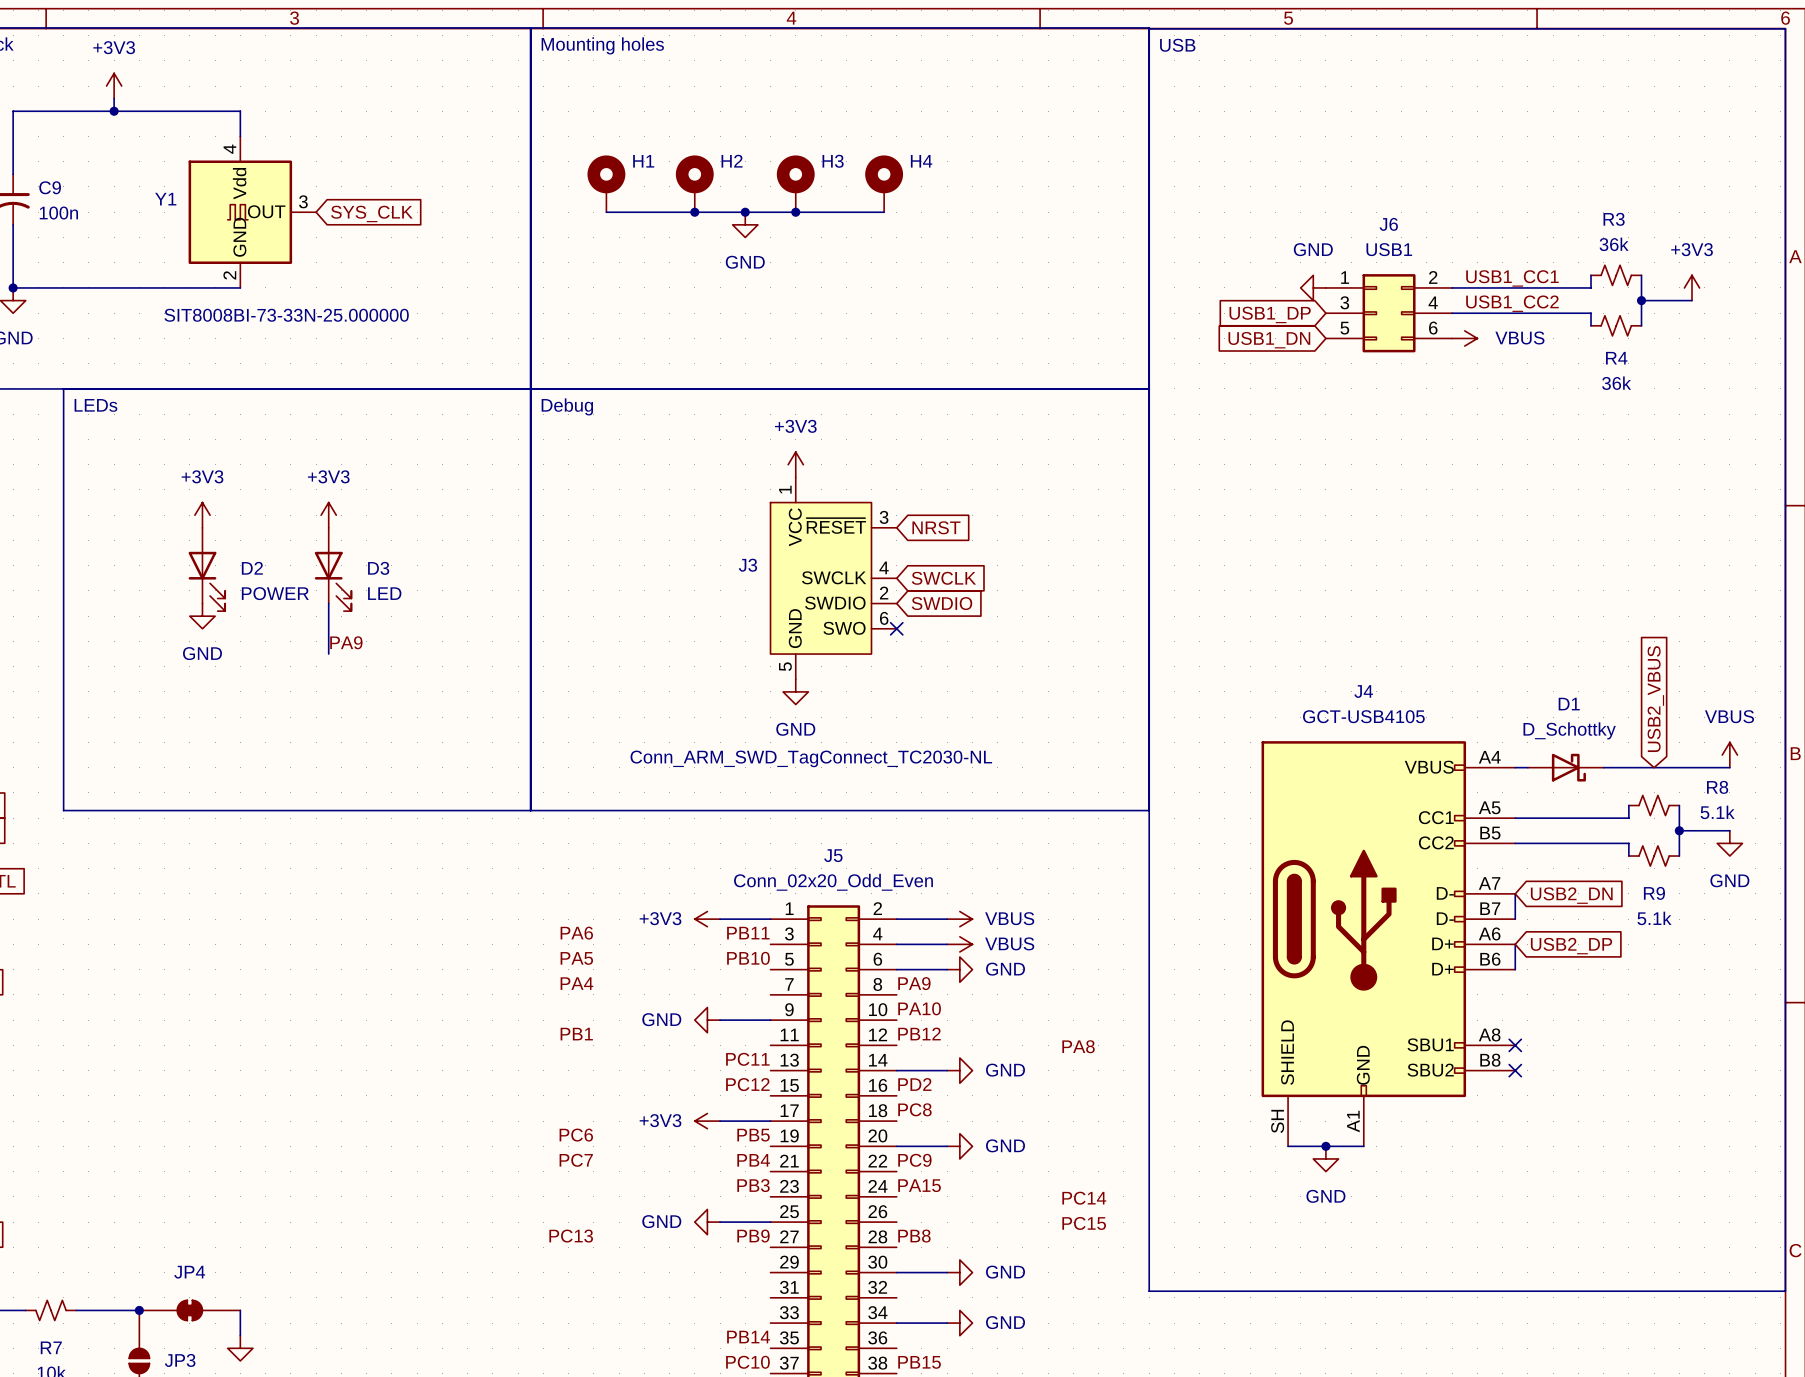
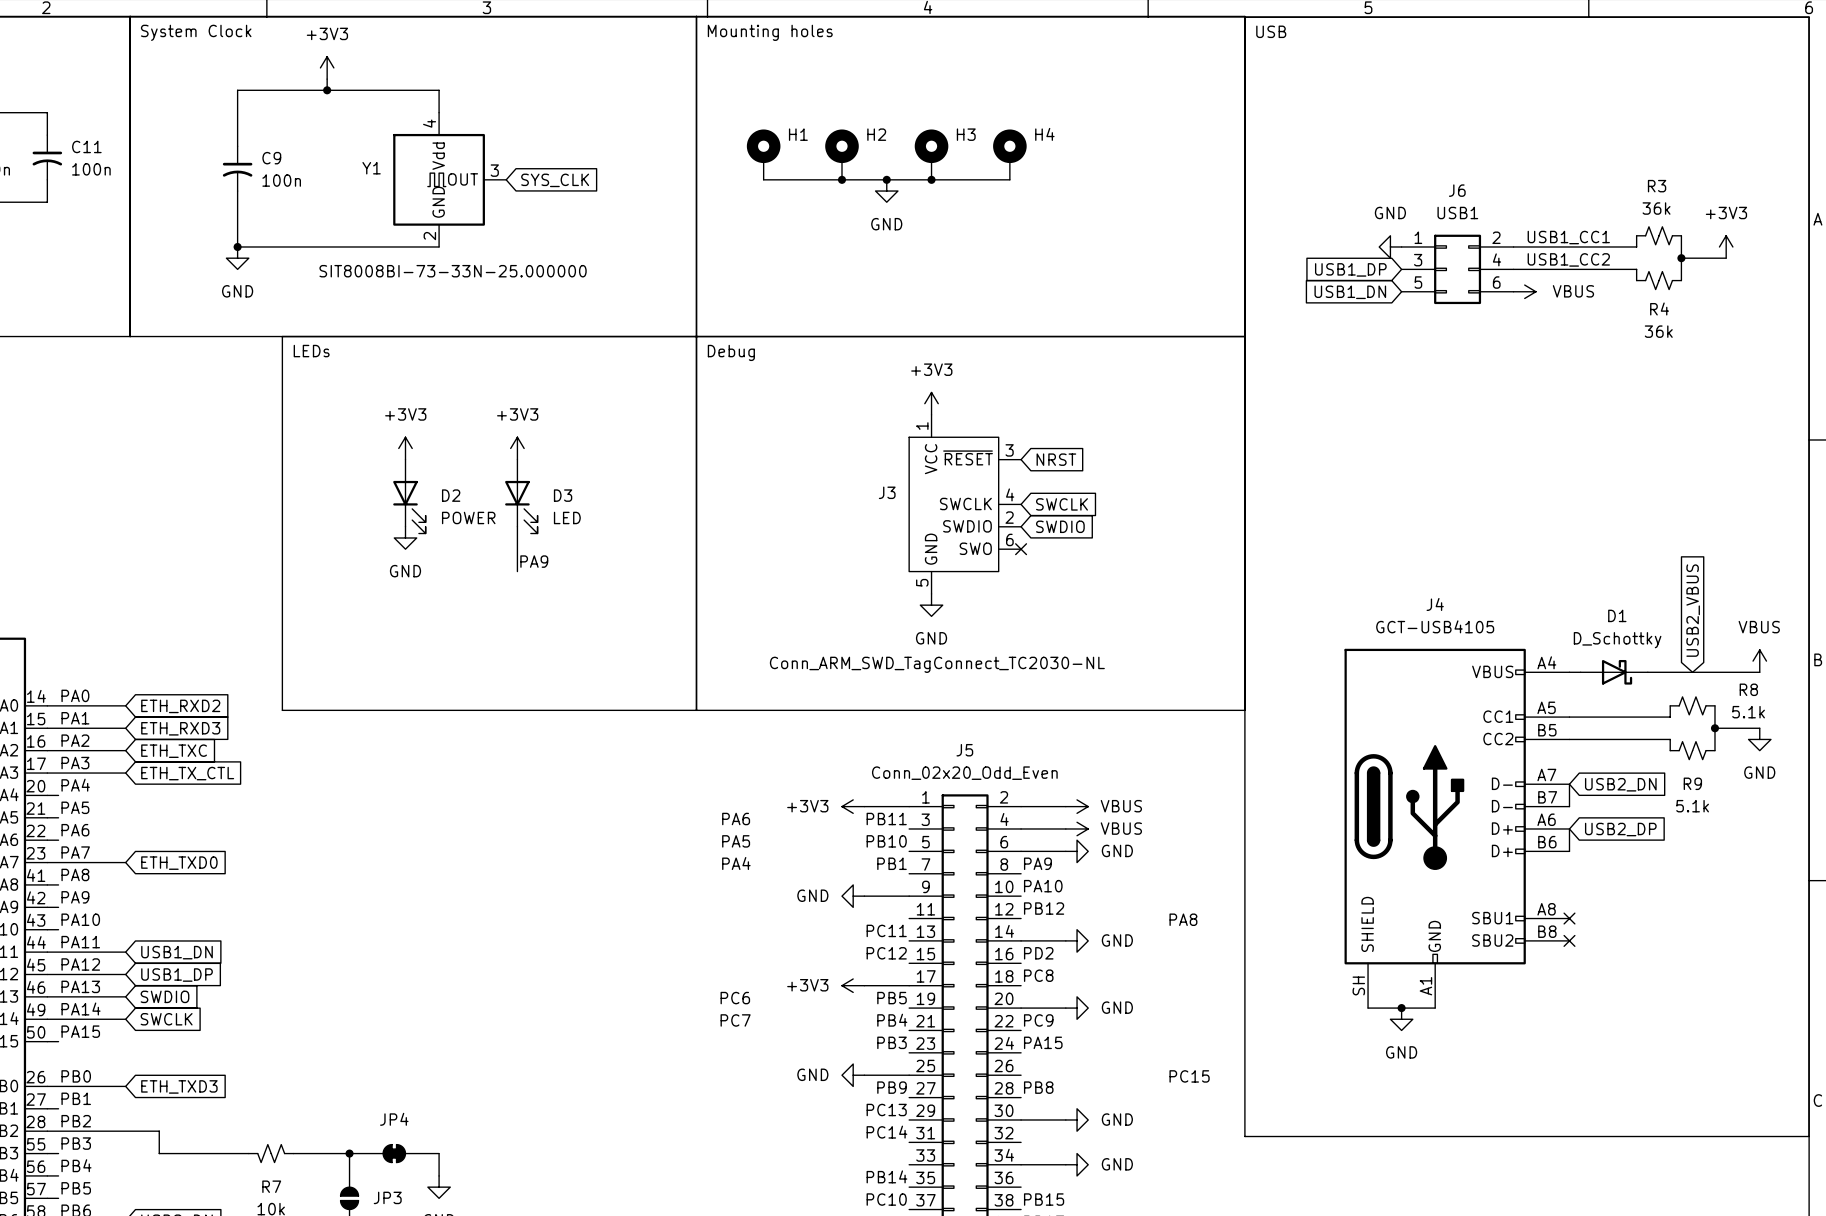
label position: PB1 (576, 1034) -> PB1 (892, 863)
label: PC14 (1084, 1198) -> none
label position: PC13 (571, 1236) -> PC13 (886, 1110)
label: none -> PC14 (886, 1132)

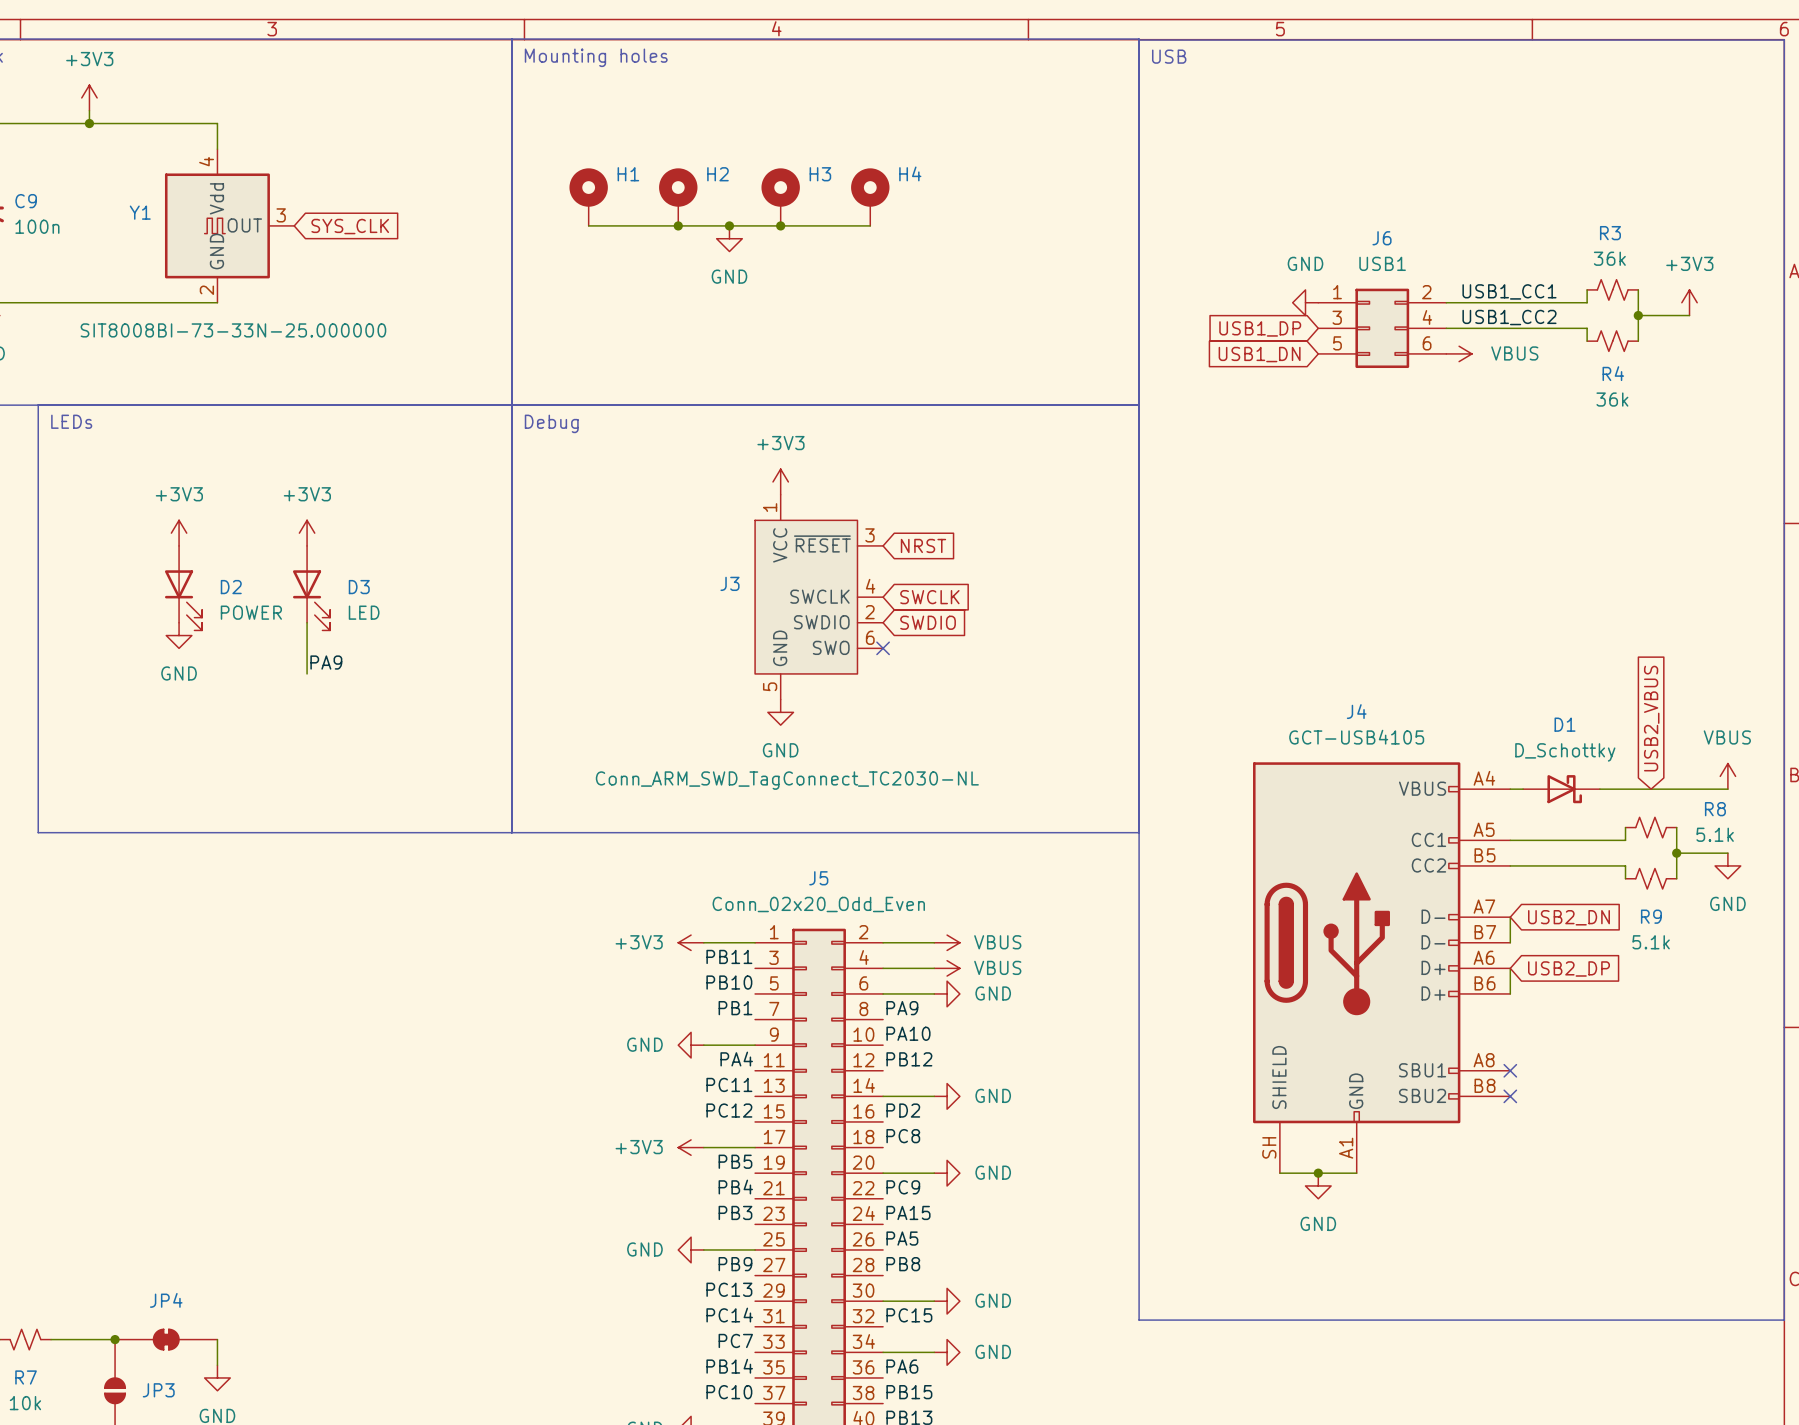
label: PA6 (736, 819) -> none
label: PA5 (736, 841) -> none
label position: PA4 (736, 863) -> PA4 (736, 1059)
label: PA8 (1183, 919) -> none
label: PC6 (735, 998) -> none
label position: PC7 (735, 1020) -> PC7 (735, 1340)
label: none -> PA5 (902, 1238)
label position: PC15 (1189, 1076) -> PC15 (909, 1315)
label: none -> PA6 (902, 1366)

